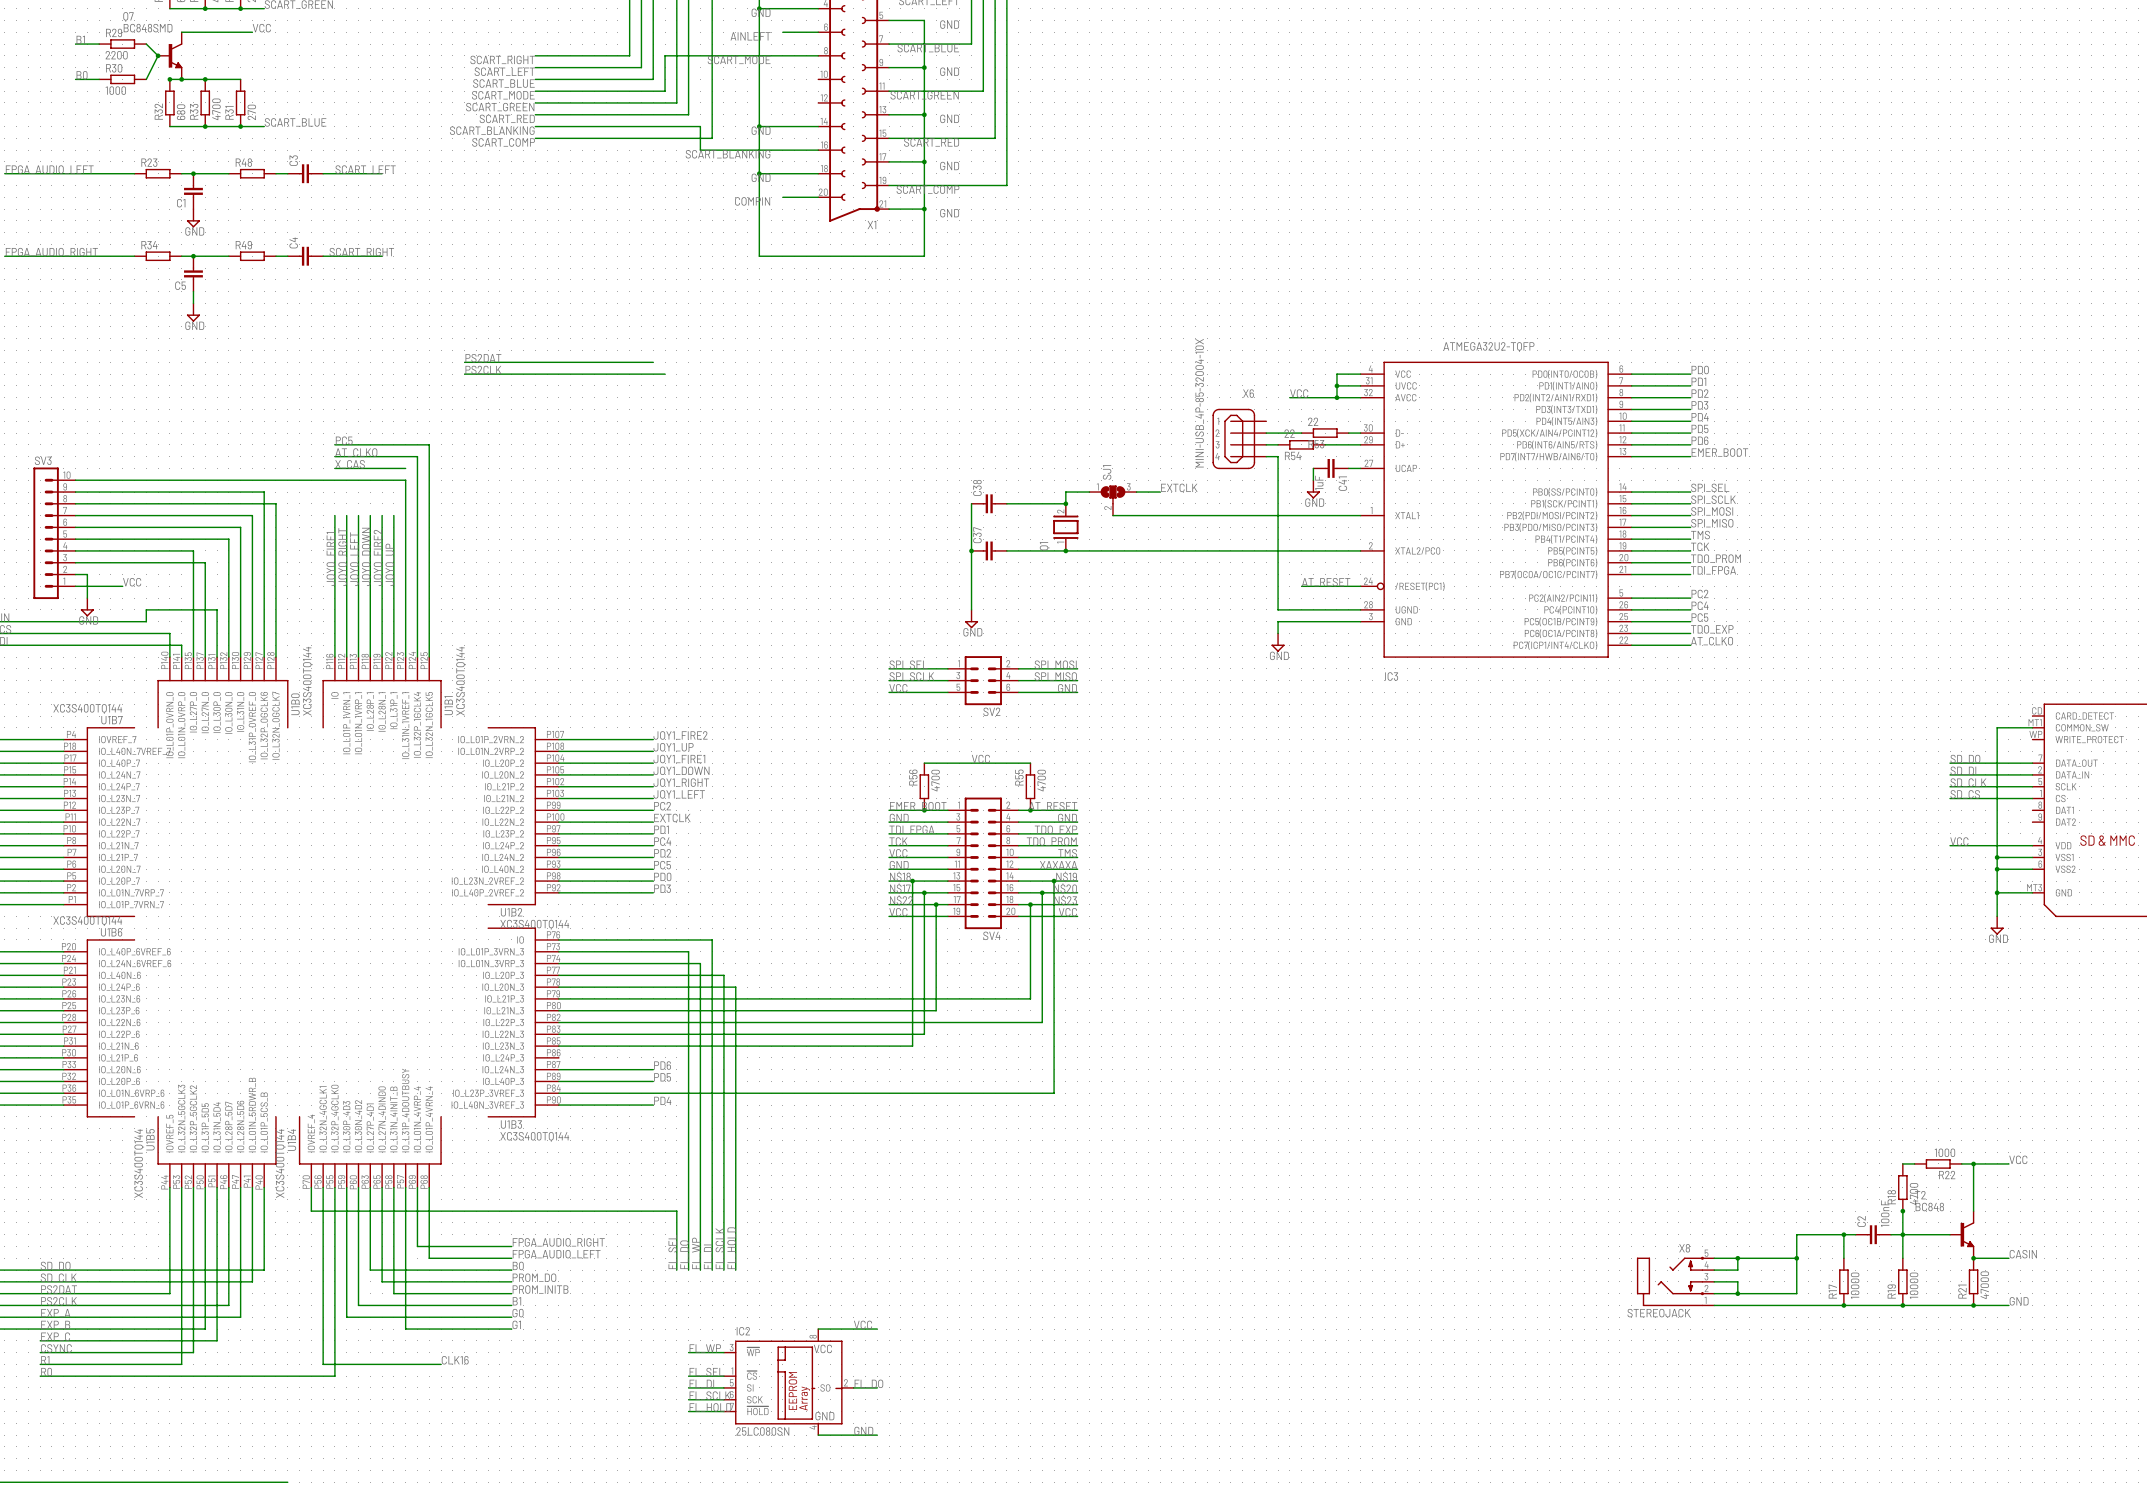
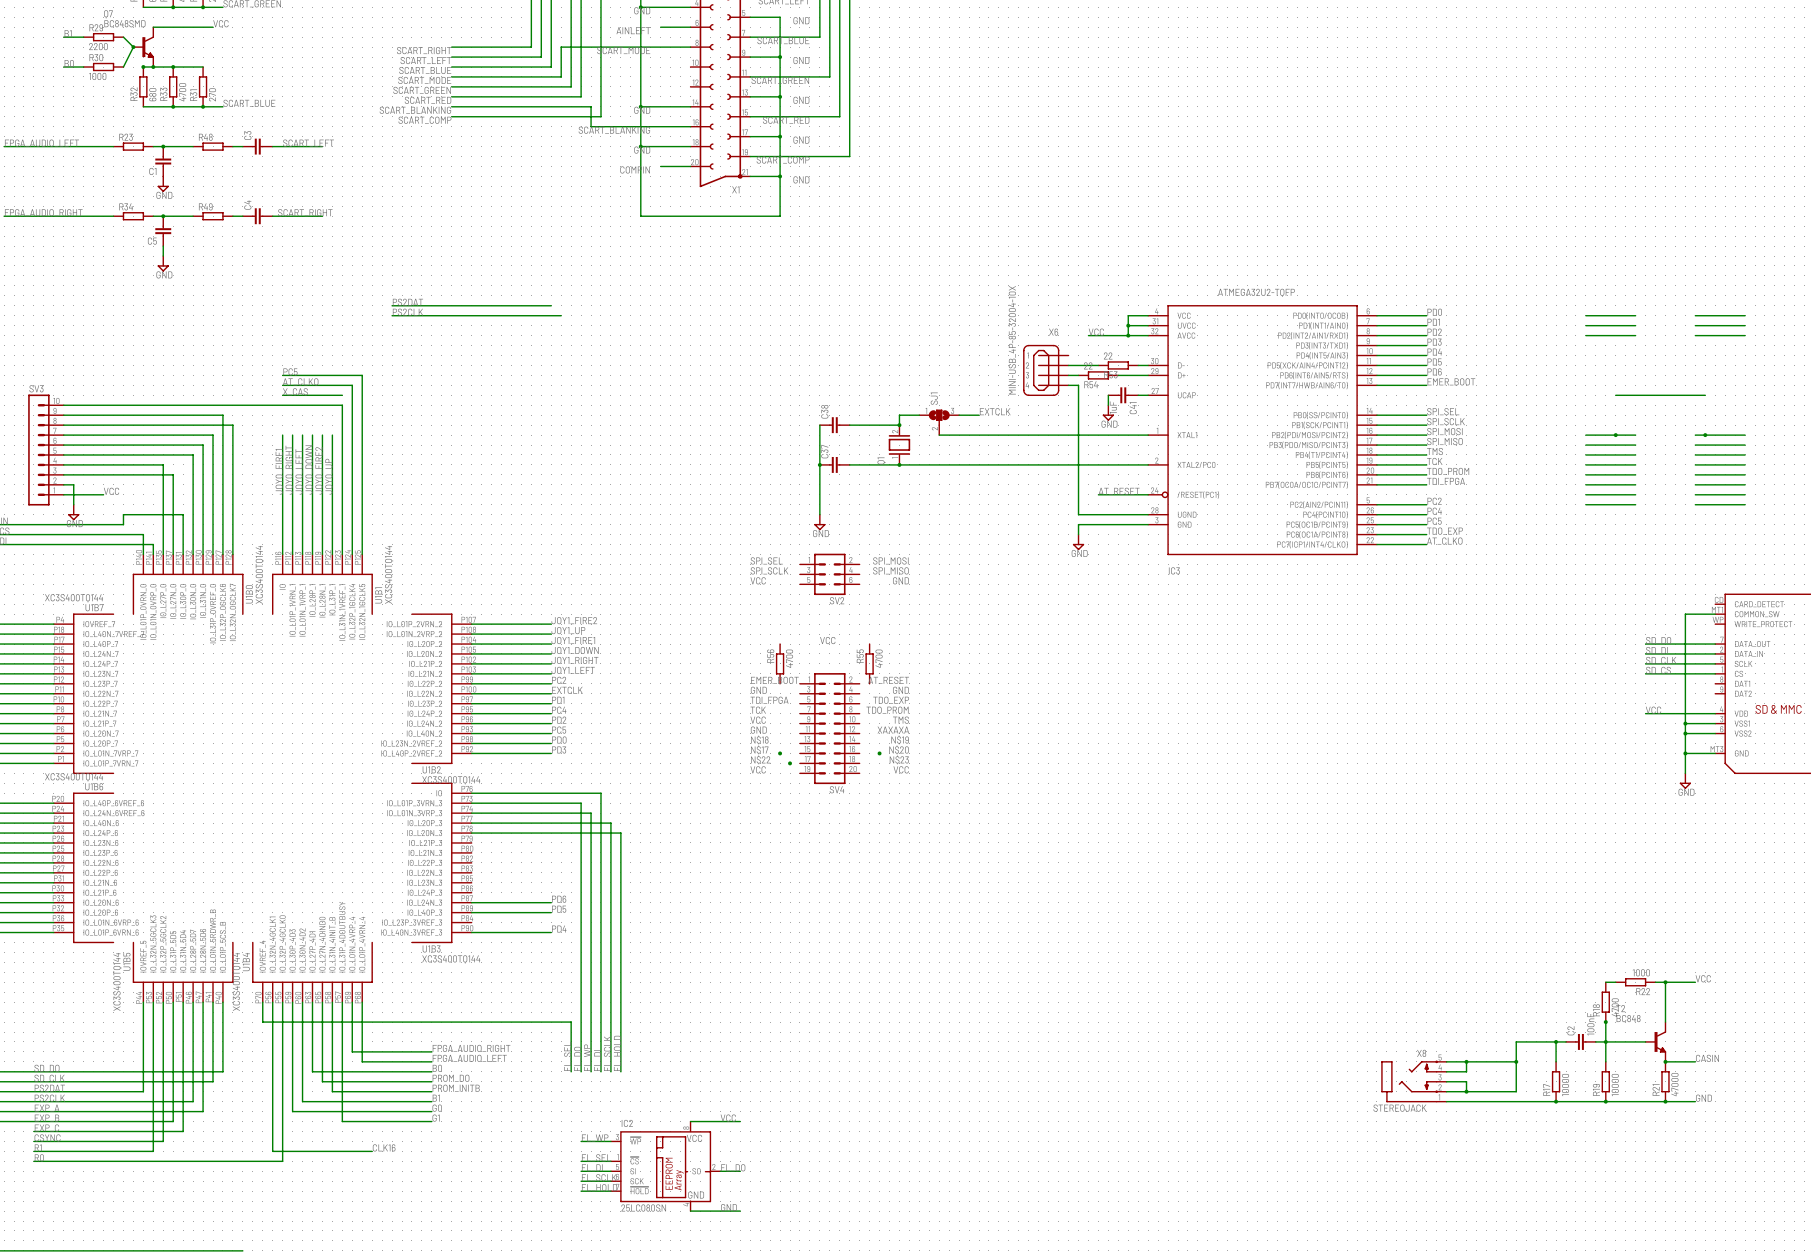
wire: none -> (1585, 315) (1635, 315)
wire: none -> (1695, 315) (1745, 315)
wire: none -> (1585, 325) (1635, 325)
wire: none -> (1695, 325) (1745, 325)
wire: none -> (1585, 335) (1635, 335)
wire: none -> (1695, 335) (1745, 335)
wire: none -> (1615, 395) (1705, 395)
wire: none -> (1585, 435) (1635, 435)
junction: none -> (1615, 435)
wire: none -> (1695, 435) (1745, 435)
junction: none -> (1705, 435)
wire: none -> (1585, 445) (1635, 445)
wire: none -> (1695, 445) (1745, 445)
wire: none -> (1585, 454) (1635, 454)
wire: none -> (1695, 454) (1745, 454)
wire: none -> (1585, 464) (1635, 464)
wire: none -> (1695, 464) (1745, 464)
wire: none -> (1585, 474) (1635, 474)
wire: none -> (1695, 474) (1745, 474)
wire: none -> (1585, 484) (1635, 484)
wire: none -> (1695, 484) (1745, 484)
wire: none -> (1585, 494) (1635, 494)
wire: none -> (1695, 494) (1745, 494)
wire: none -> (1585, 504) (1635, 504)
wire: none -> (1695, 504) (1745, 504)
wire: (889, 668) (947, 668) -> none
wire: (1018, 668) (1077, 668) -> none
wire: (889, 680) (947, 680) -> none
wire: (1018, 680) (1077, 680) -> none
wire: (889, 692) (947, 692) -> none
wire: (1018, 692) (1077, 692) -> none
wire: (924, 763) (1030, 763) -> none
wire: (889, 810) (947, 810) -> none
junction: (924, 810) -> none
wire: (1018, 810) (1077, 810) -> none
junction: (1030, 810) -> none
wire: (889, 822) (947, 822) -> none
wire: (1018, 822) (1077, 822) -> none
wire: (889, 833) (947, 833) -> none
wire: (1018, 833) (1077, 833) -> none
wire: (889, 845) (947, 845) -> none
wire: (1018, 845) (1077, 845) -> none
wire: (889, 857) (947, 857) -> none
wire: (1018, 857) (1077, 857) -> none
wire: (889, 869) (947, 869) -> none
wire: (1018, 869) (1077, 869) -> none
wire: (889, 881) (947, 881) -> none
wire: (912, 881) (912, 1046) (558, 1046) -> none
junction: (912, 881) -> none
wire: (1018, 881) (1077, 881) -> none
wire: (1054, 881) (1054, 1093) (558, 1093) -> none
junction: (1054, 881) -> none
wire: (889, 892) (947, 892) -> none
wire: (924, 892) (924, 1034) (558, 1034) -> none
wire: (1018, 892) (1077, 892) -> none
wire: (1042, 892) (1042, 1022) (558, 1022) -> none
wire: (889, 904) (947, 904) -> none
wire: (936, 904) (936, 1010) (558, 1010) -> none
wire: (1018, 904) (1077, 904) -> none
wire: (1030, 904) (1030, 998) (558, 998) -> none
junction: (1030, 904) -> none
wire: (889, 916) (947, 916) -> none
wire: (1018, 916) (1077, 916) -> none

